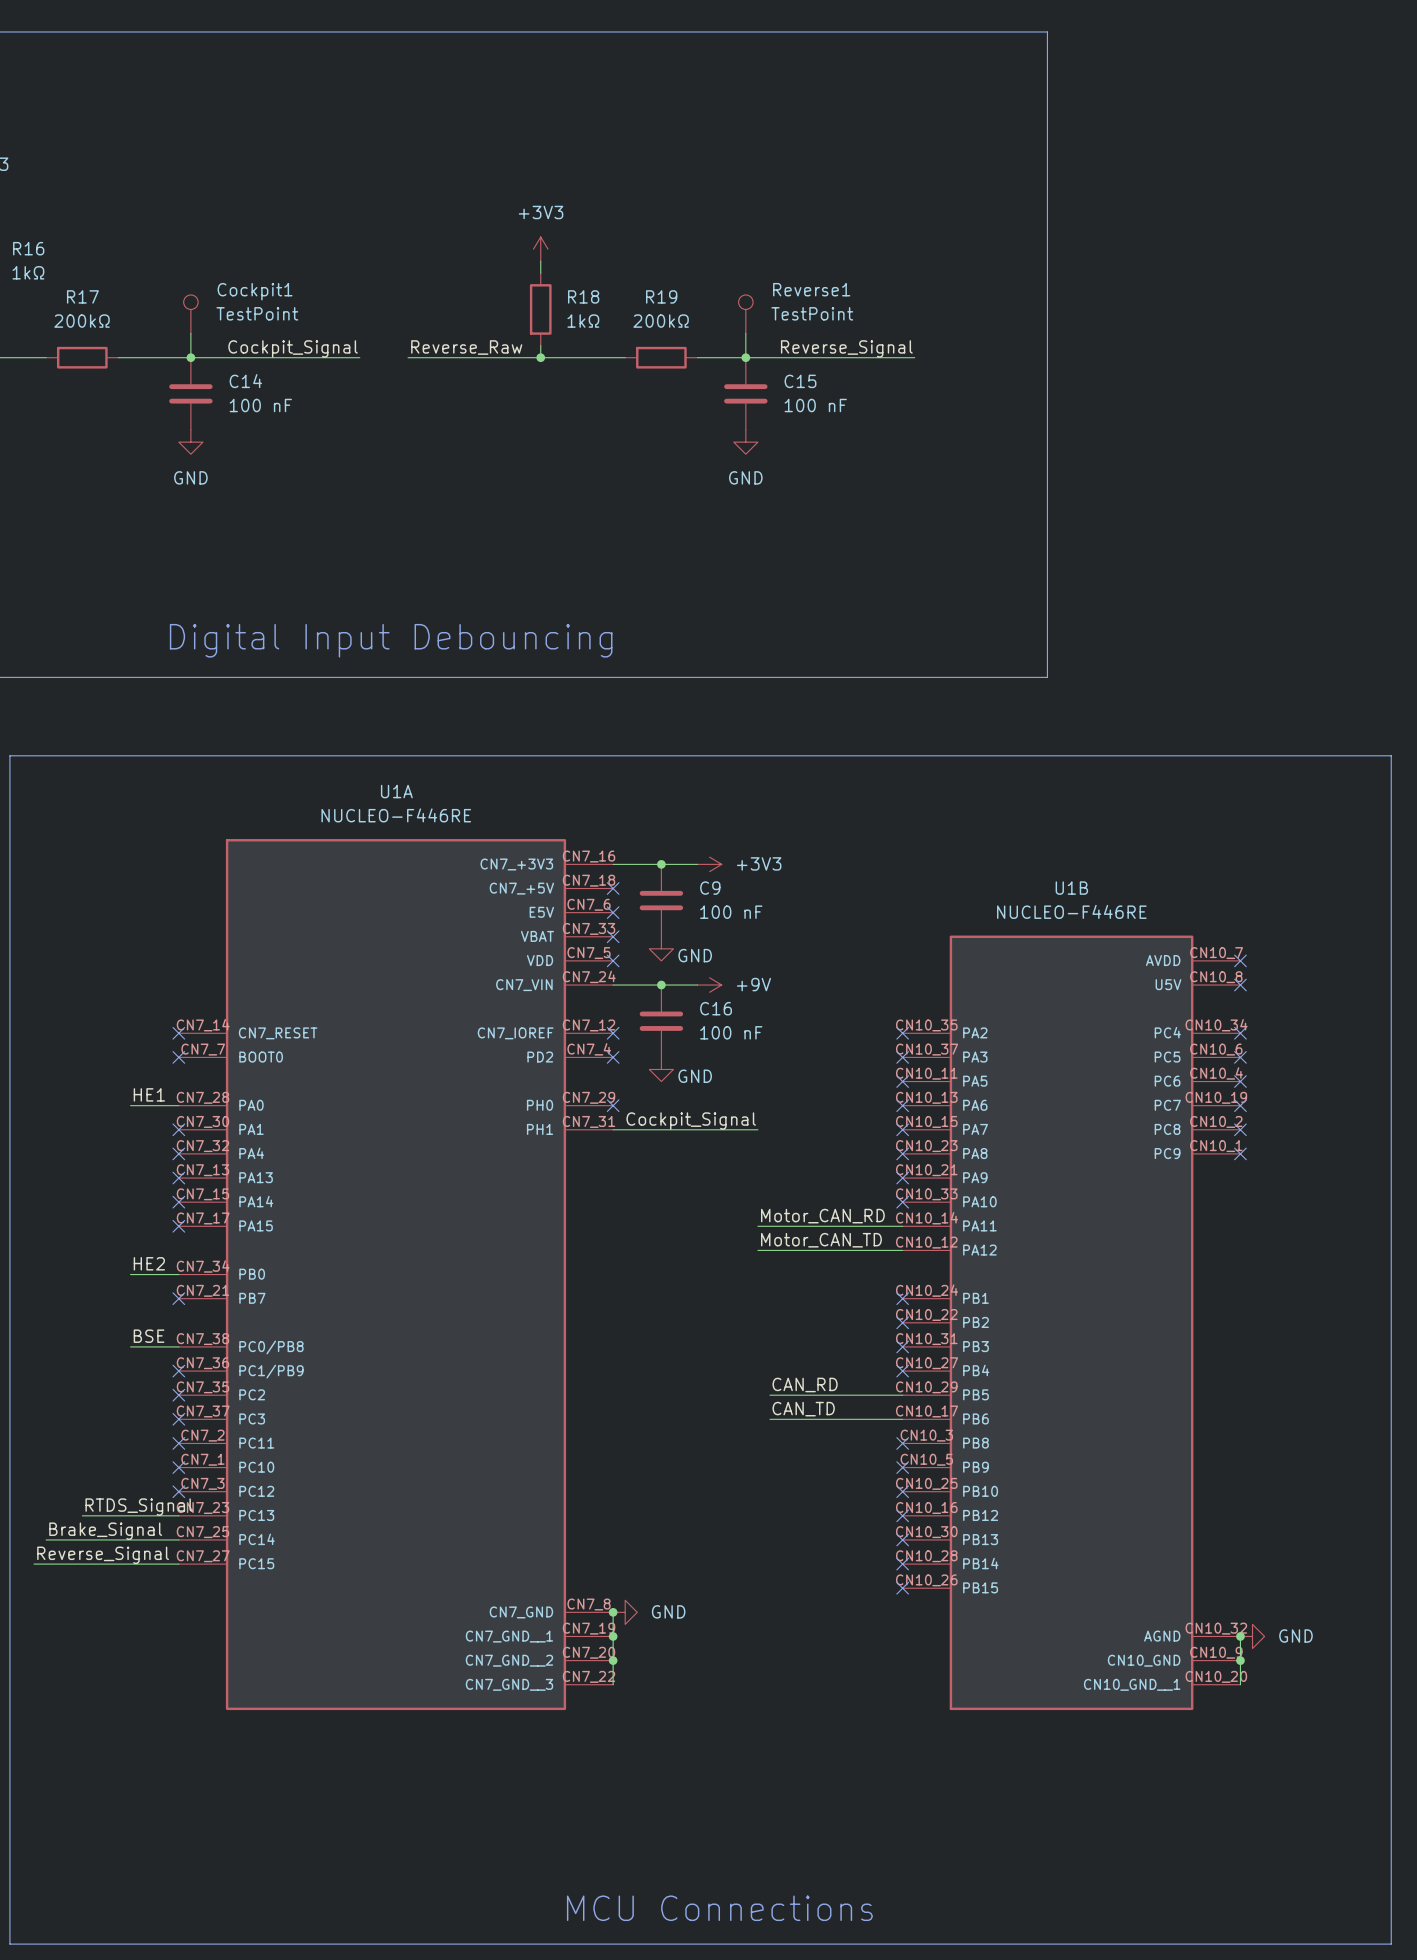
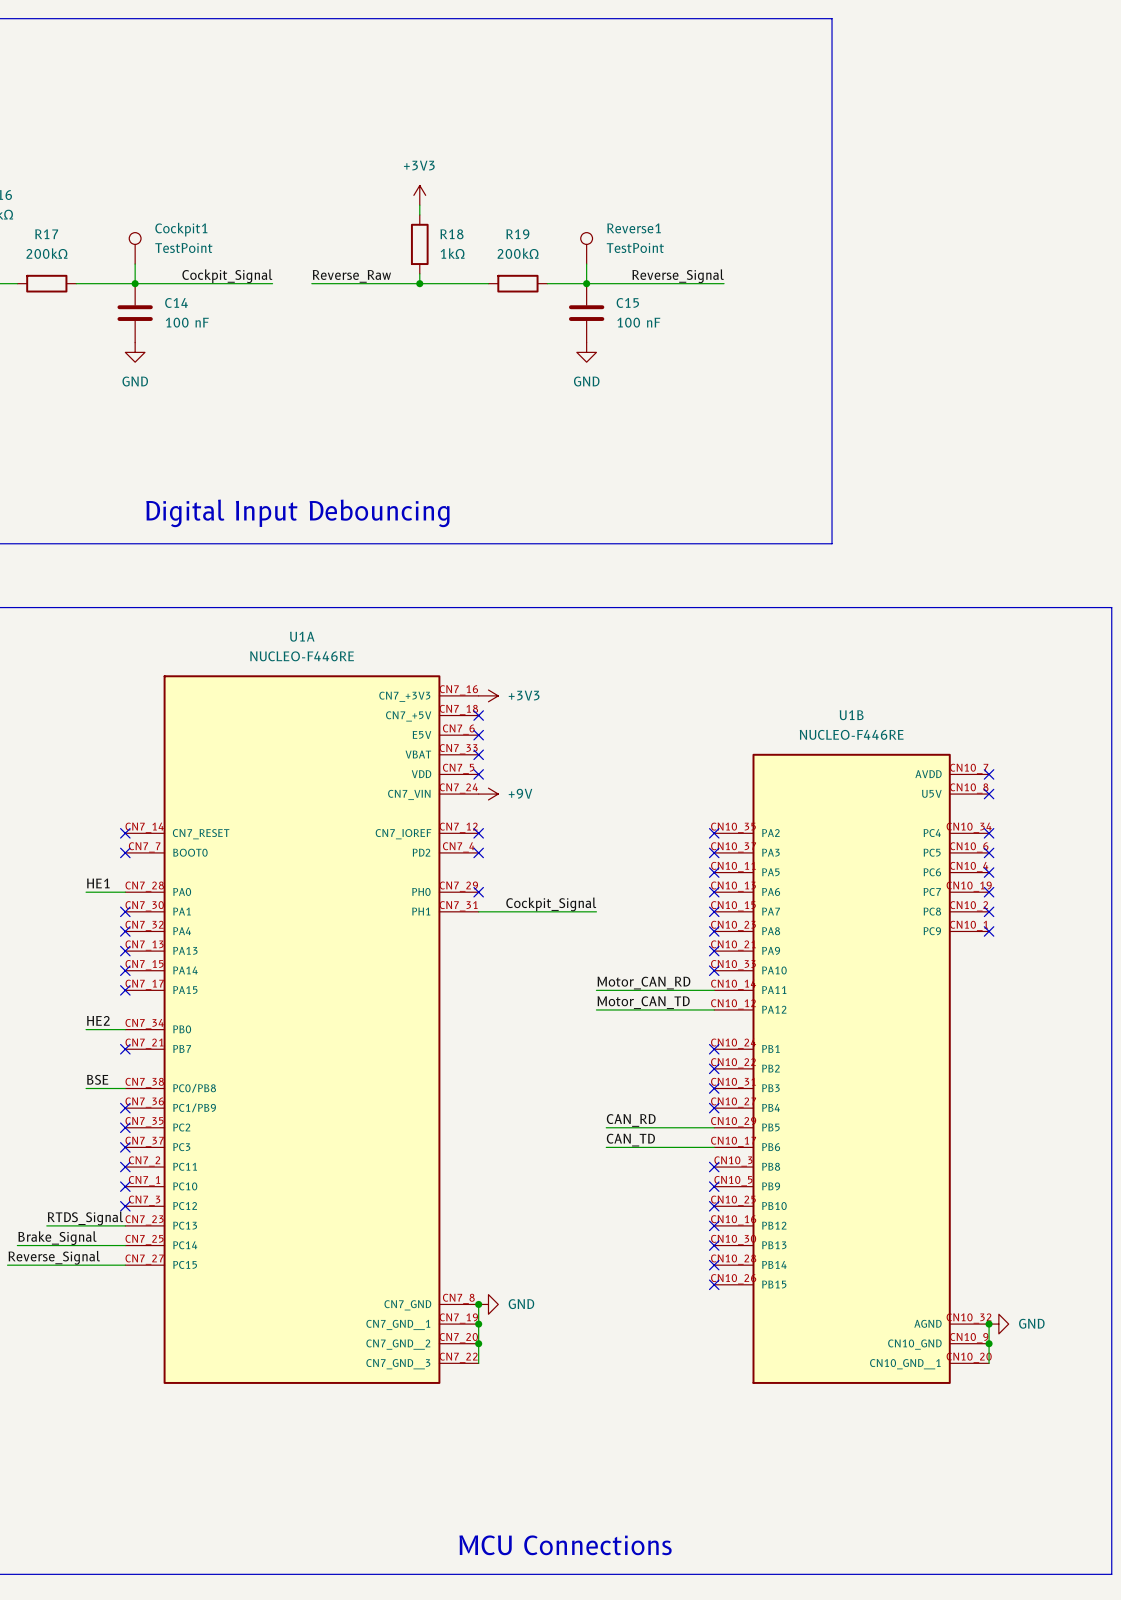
wire: (613, 864) (697, 864) -> none
junction: (661, 864) -> none
power symbol position: +3V3 (709, 864) -> +3V3 (488, 695)
C9: 100 nF (661, 900) -> none
power symbol: GND (661, 948) -> none
wire: (613, 985) (697, 985) -> none
junction: (661, 985) -> none
power symbol position: +9V (709, 985) -> +9V (488, 794)
C16: 100 nF (661, 1021) -> none
power symbol: GND (661, 1069) -> none

